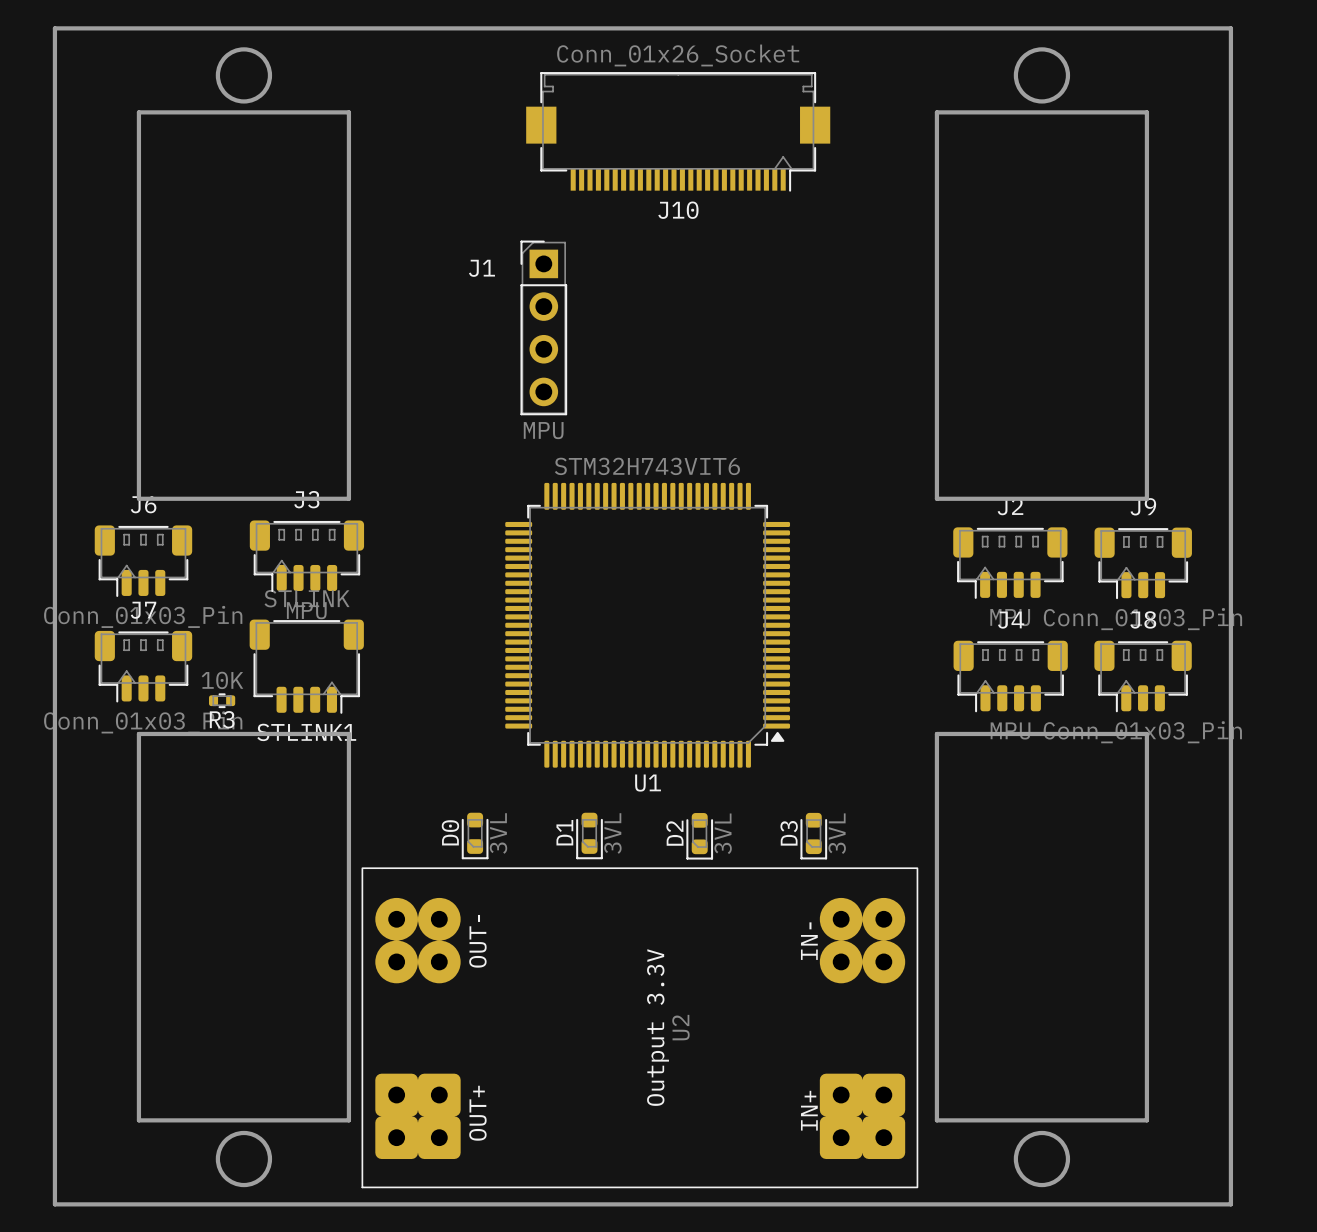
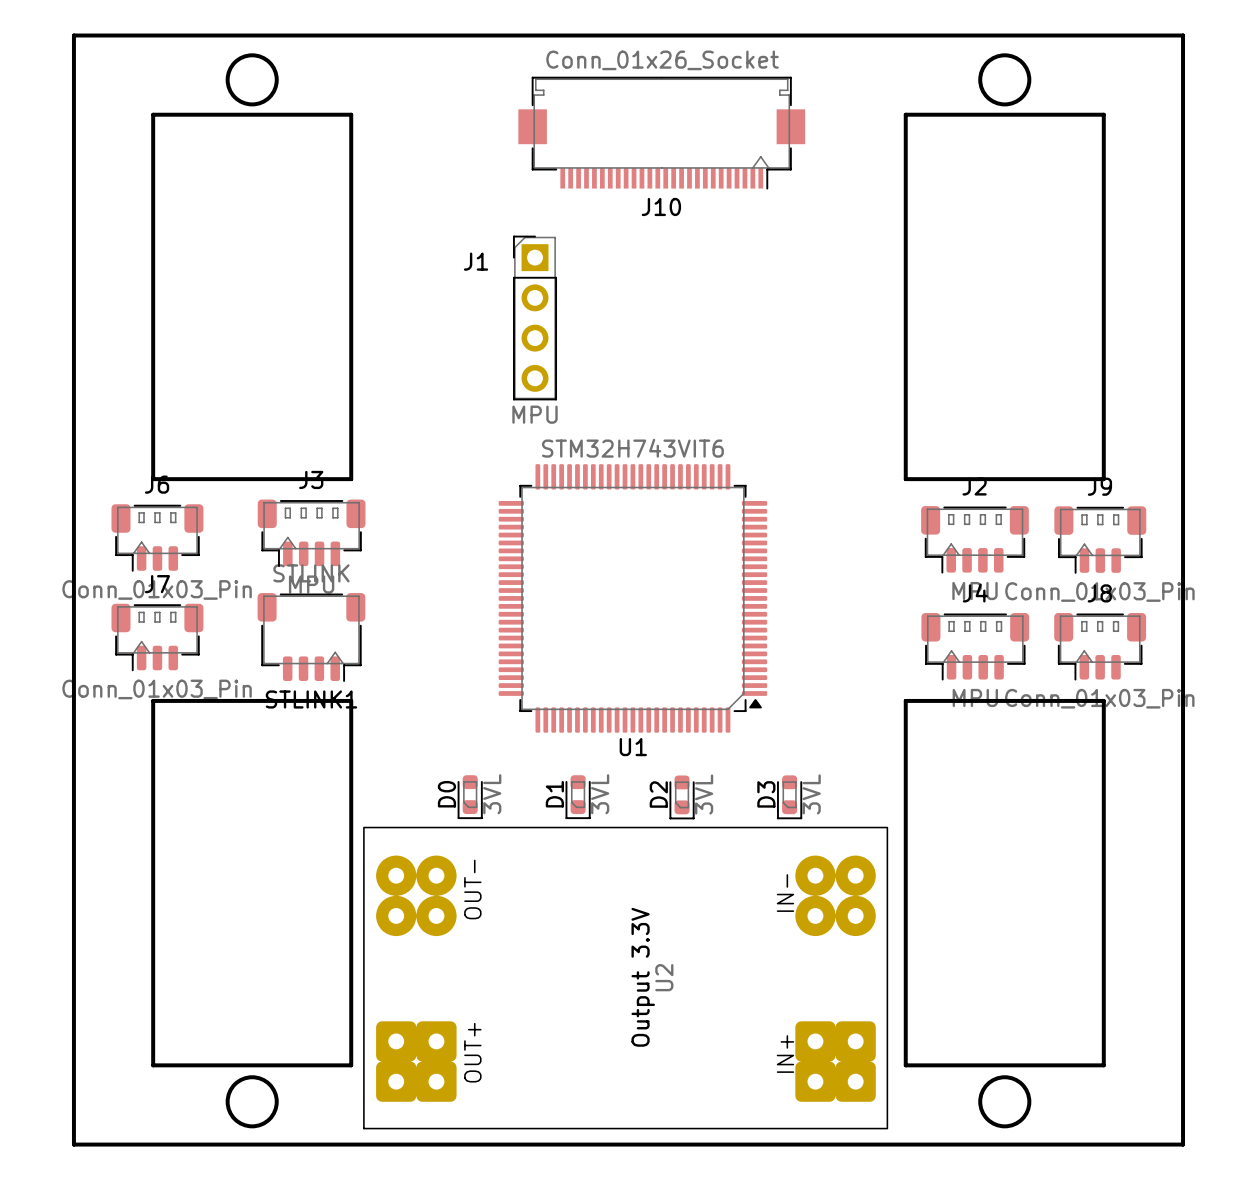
R3: 10K (222, 700) -> none

